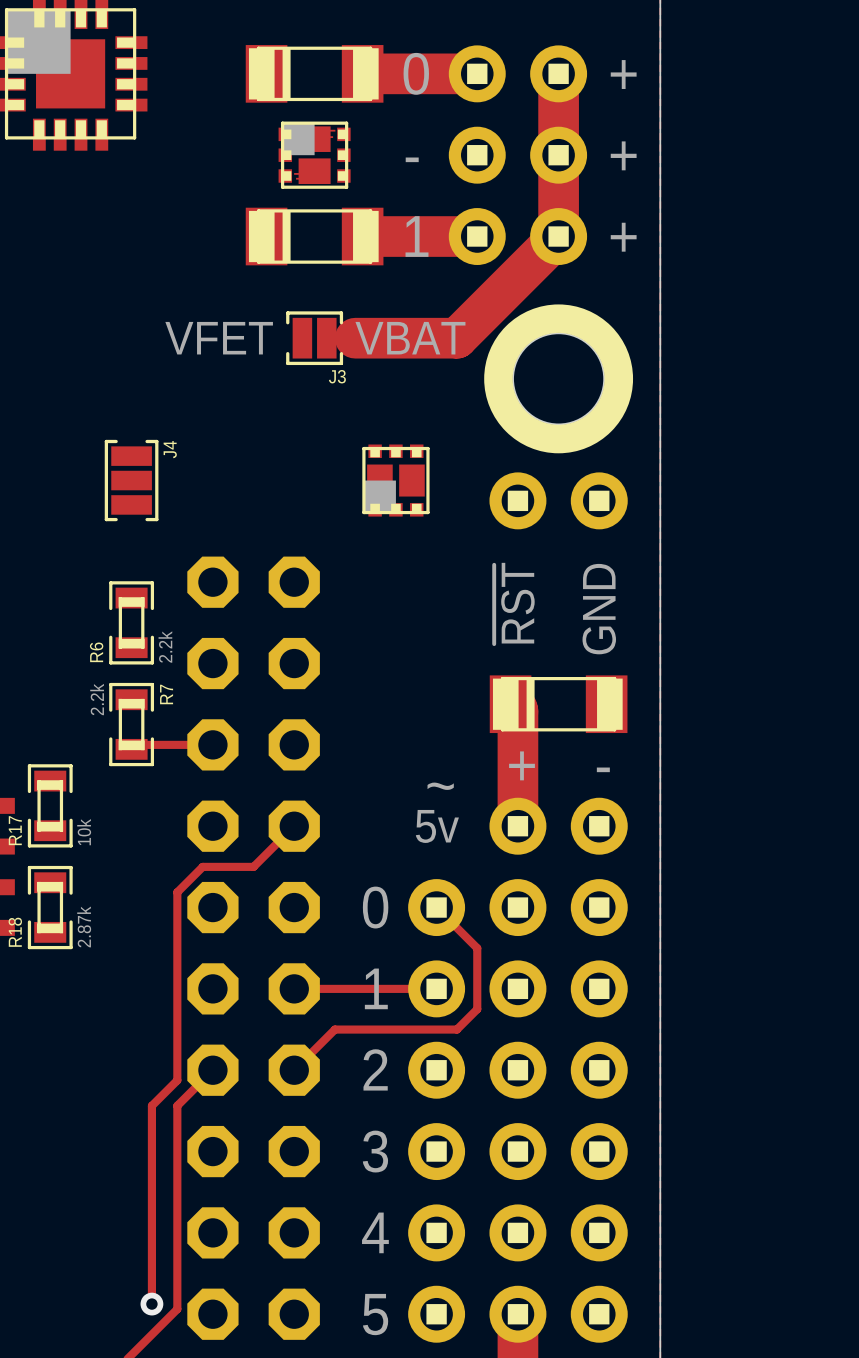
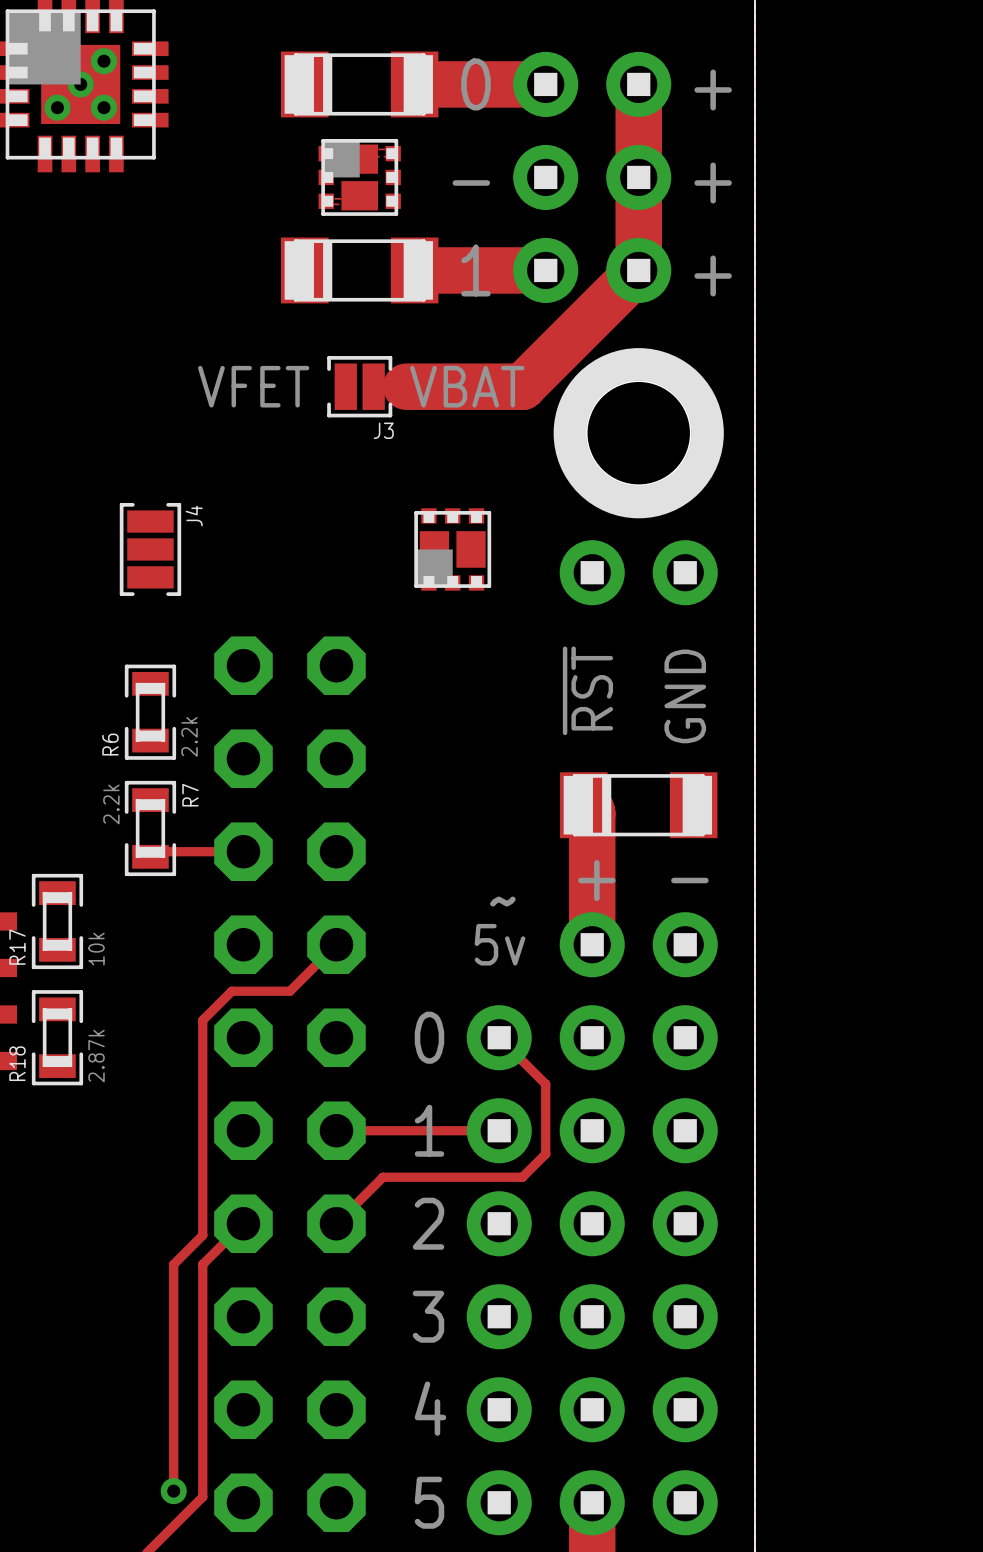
via: none -> (103, 61)
via: none -> (80, 84)
via: none -> (57, 107)
via: none -> (103, 107)

